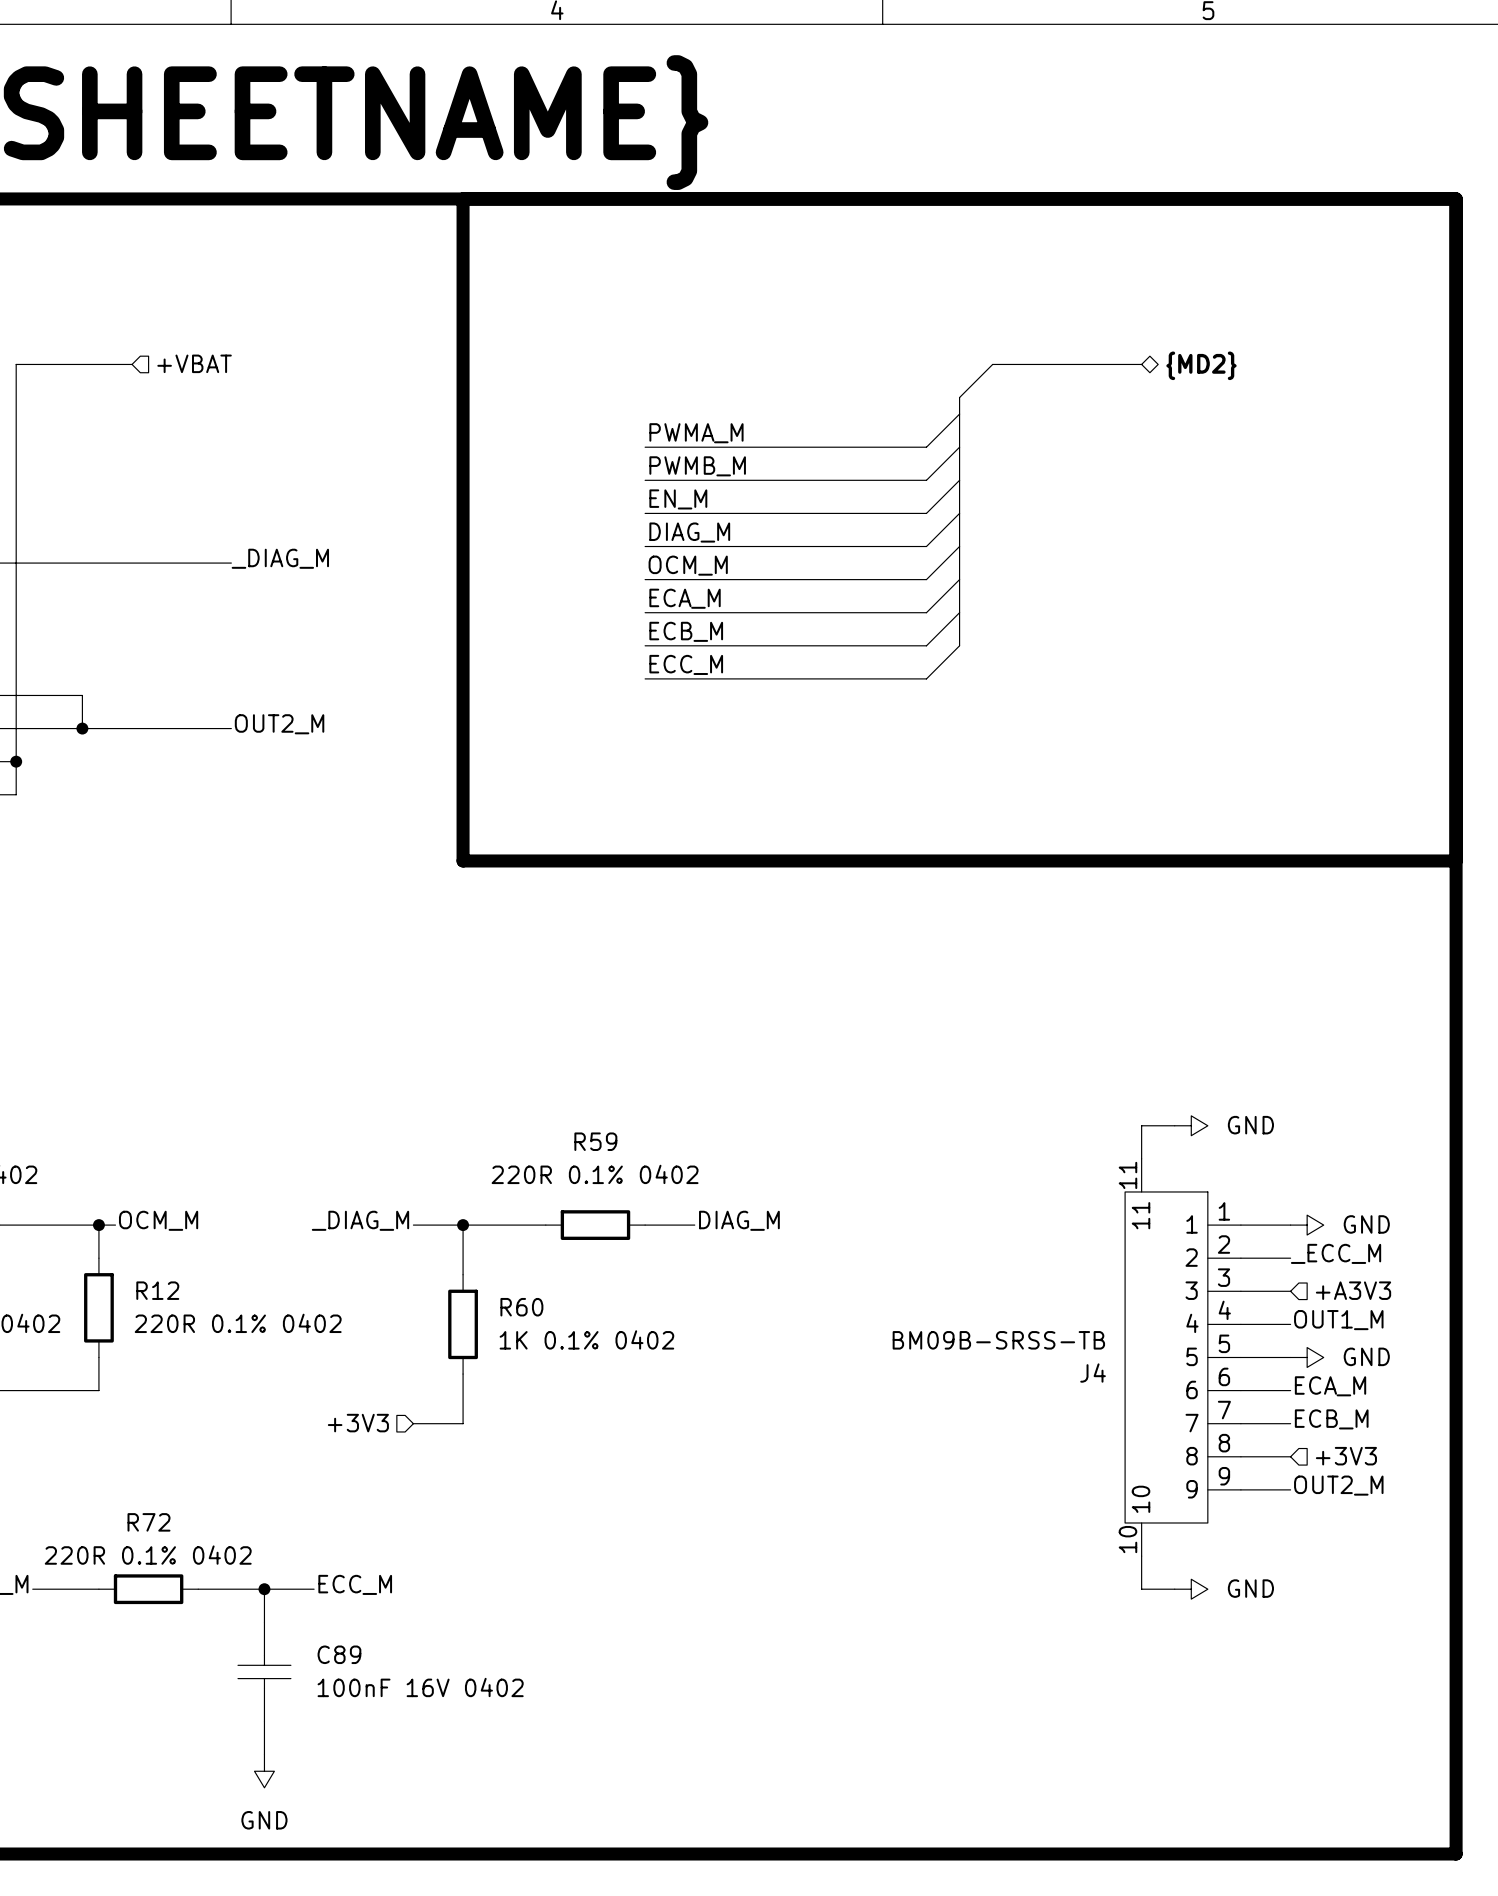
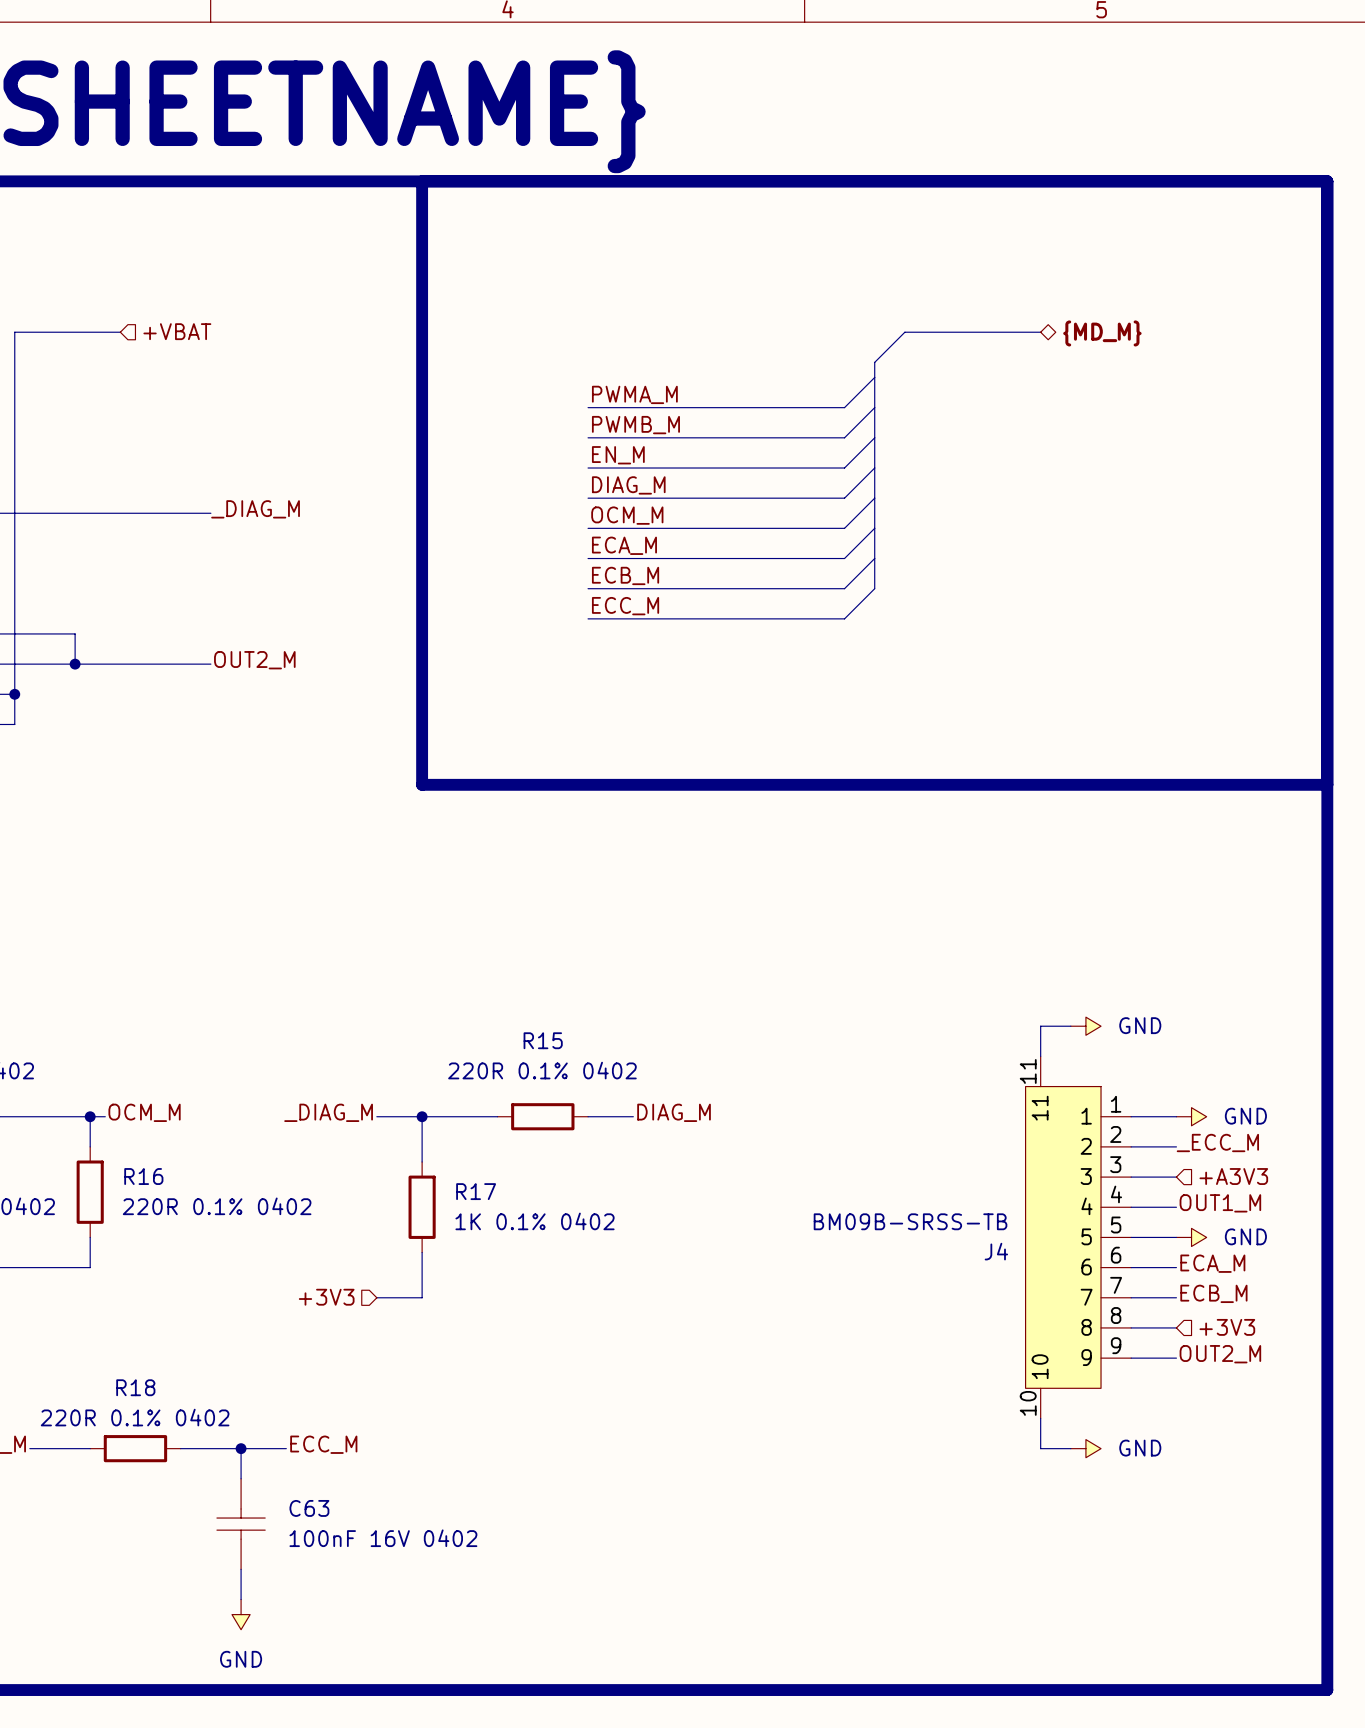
hierarchical label: {MD2} (1201, 365) -> {MD_M} (1102, 333)
R59 name: R59 (595, 1141) -> R15 (543, 1040)
R12 name: R12 (157, 1290) -> R16 (143, 1176)
R60 name: R60 (521, 1307) -> R17 (476, 1191)
R72 name: R72 (148, 1522) -> R18 (135, 1387)
C89 name: C89 (339, 1654) -> C63 (309, 1508)

